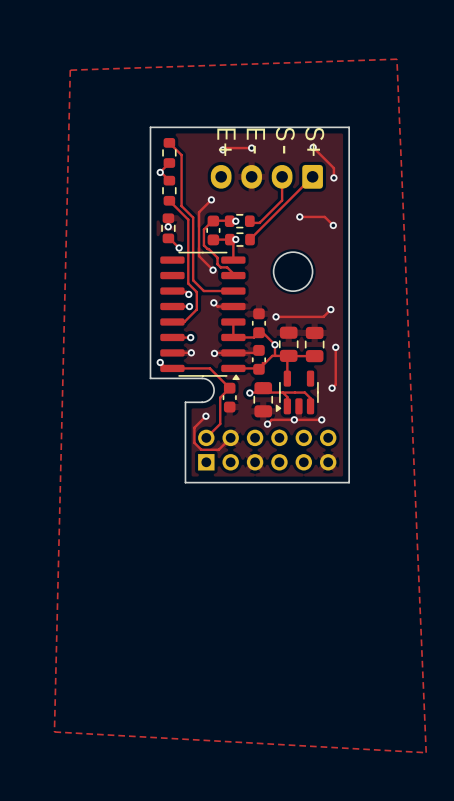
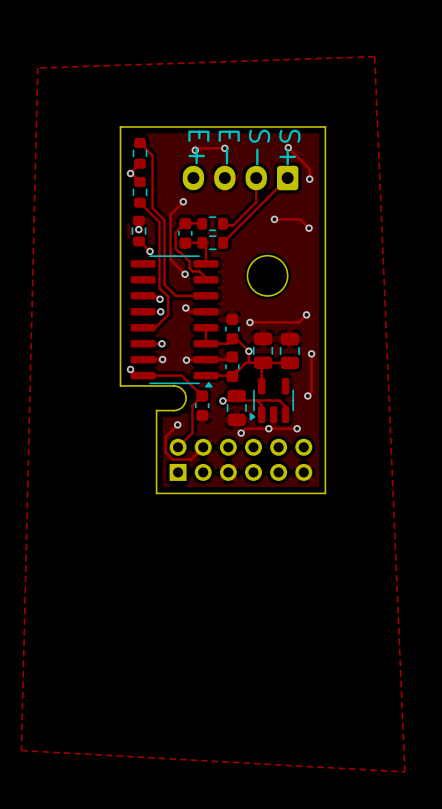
via: (235, 221) -> none
via: (235, 239) -> none

